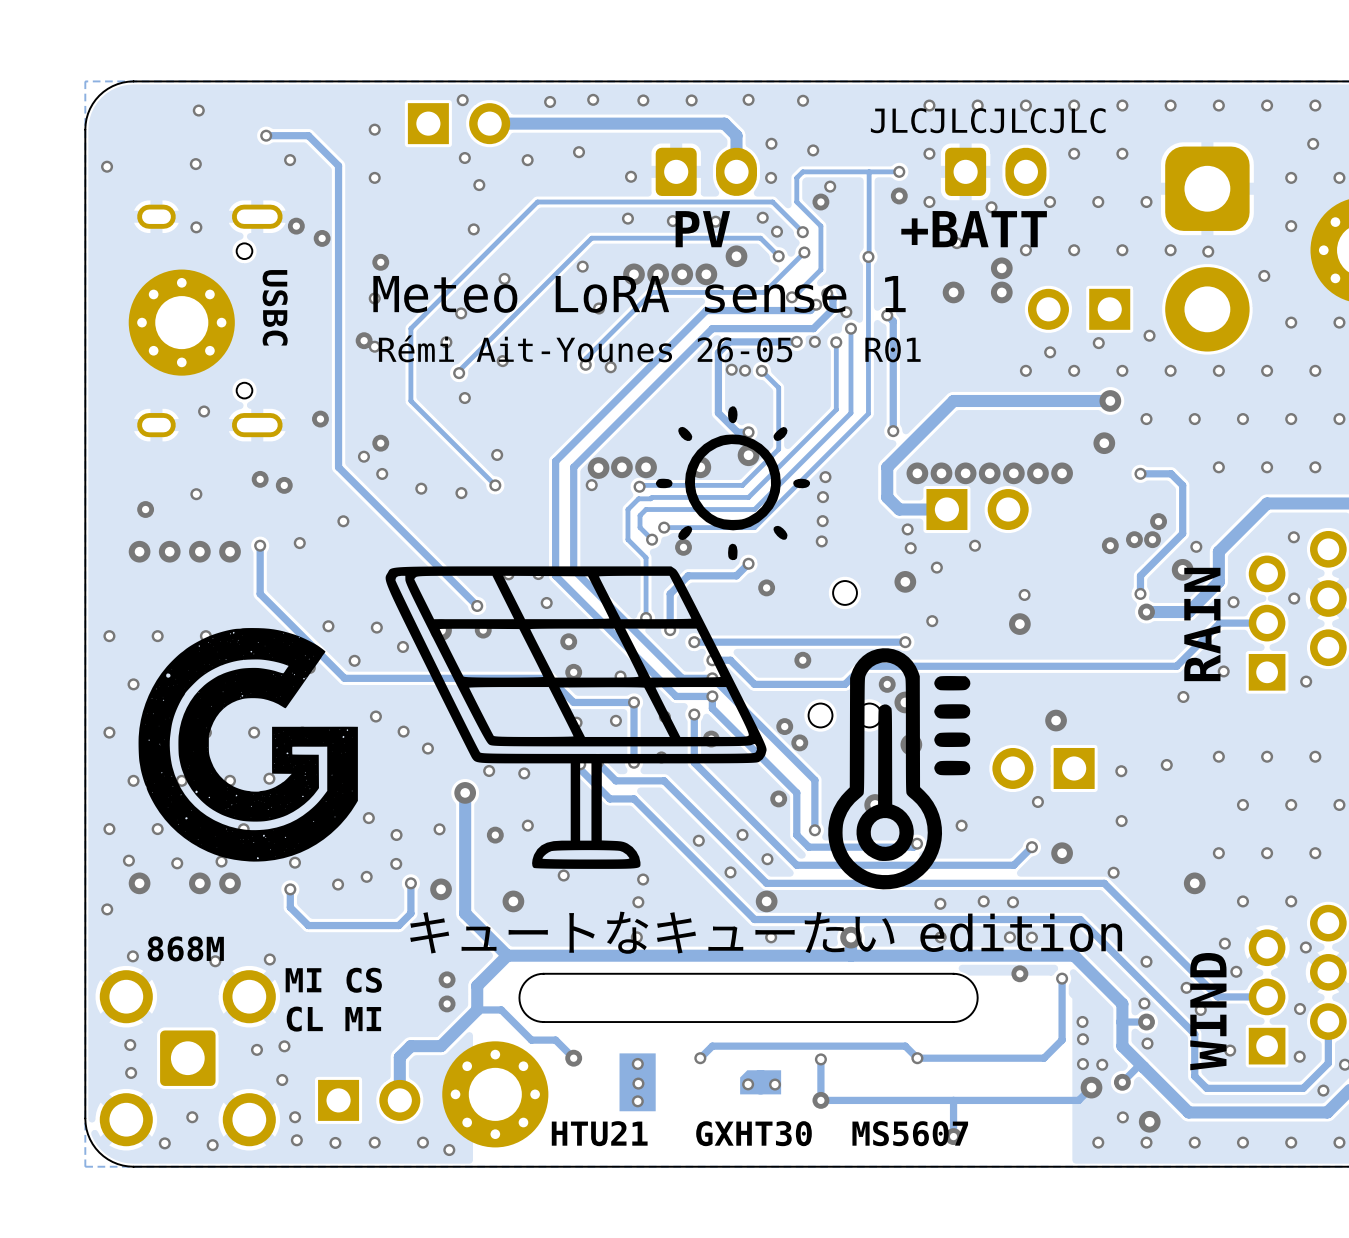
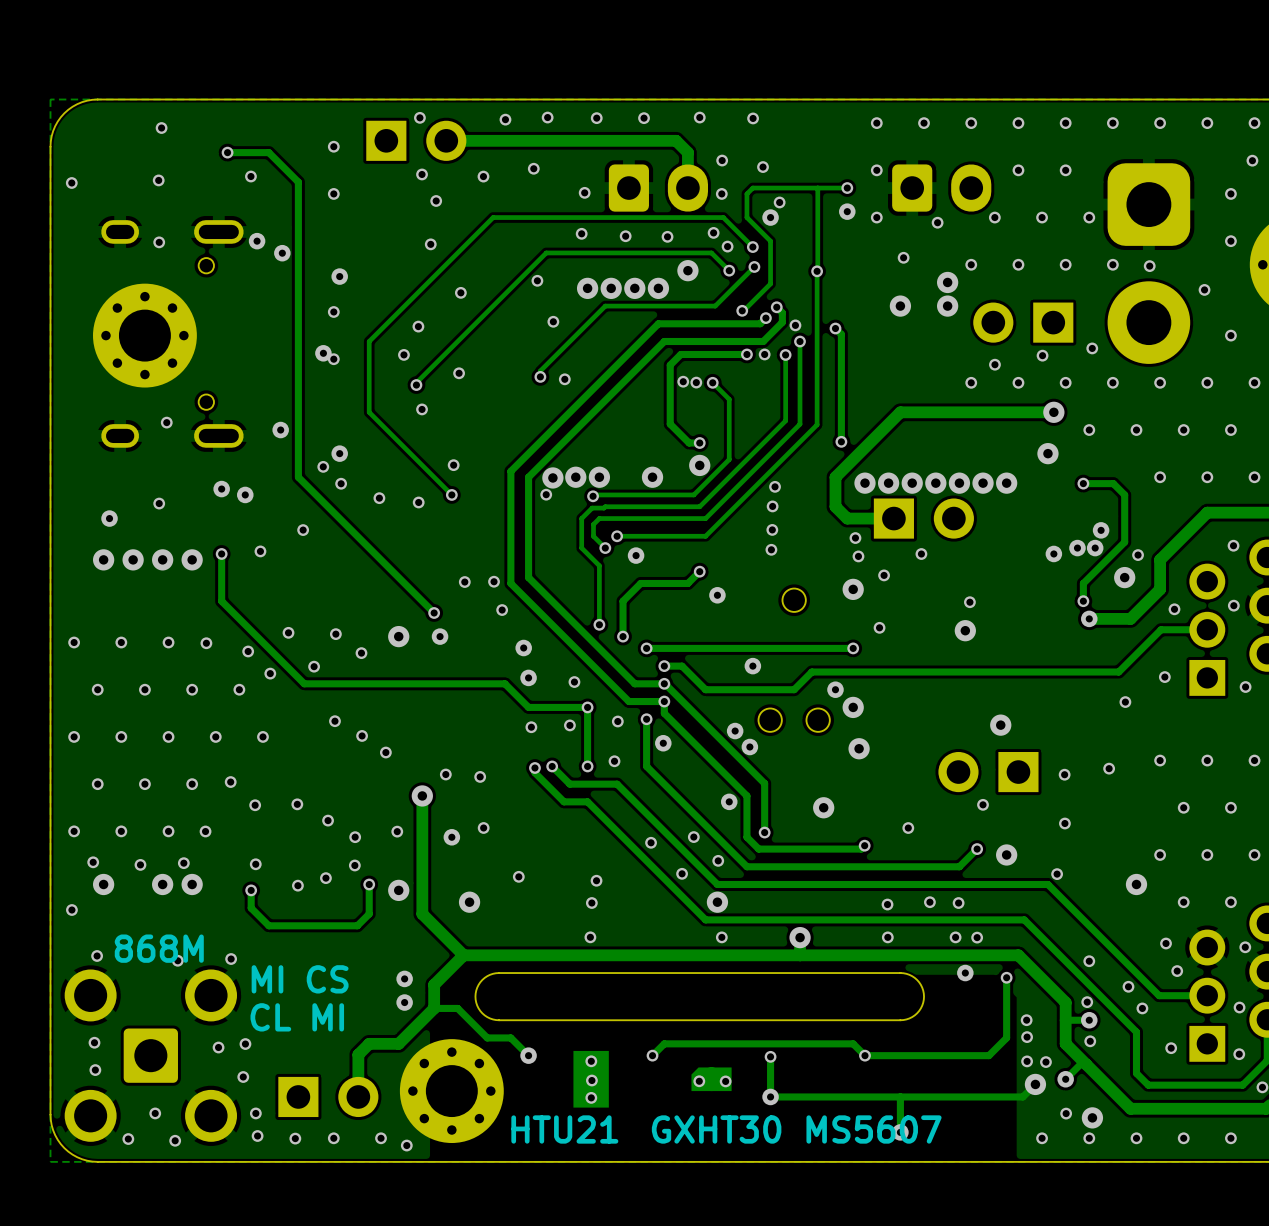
text: JLCJLCJLCJLC (988, 120) -> none
text: PV (702, 229) -> none
text: +BATT (974, 229) -> none
text: Meteo LoRA sense 1 (639, 294) -> none
text: USBC (275, 307) -> none
text: Rémi Ait-Younes 26-05 (585, 348) -> none
text: R01 (893, 349) -> none
drawing: [138, 406, 971, 890] -> none
text: RAIN (1202, 624) -> none
text: キュートなキューたい (652, 932) -> none
text: edition (1021, 932) -> none
text: WIND (1208, 1011) -> none

